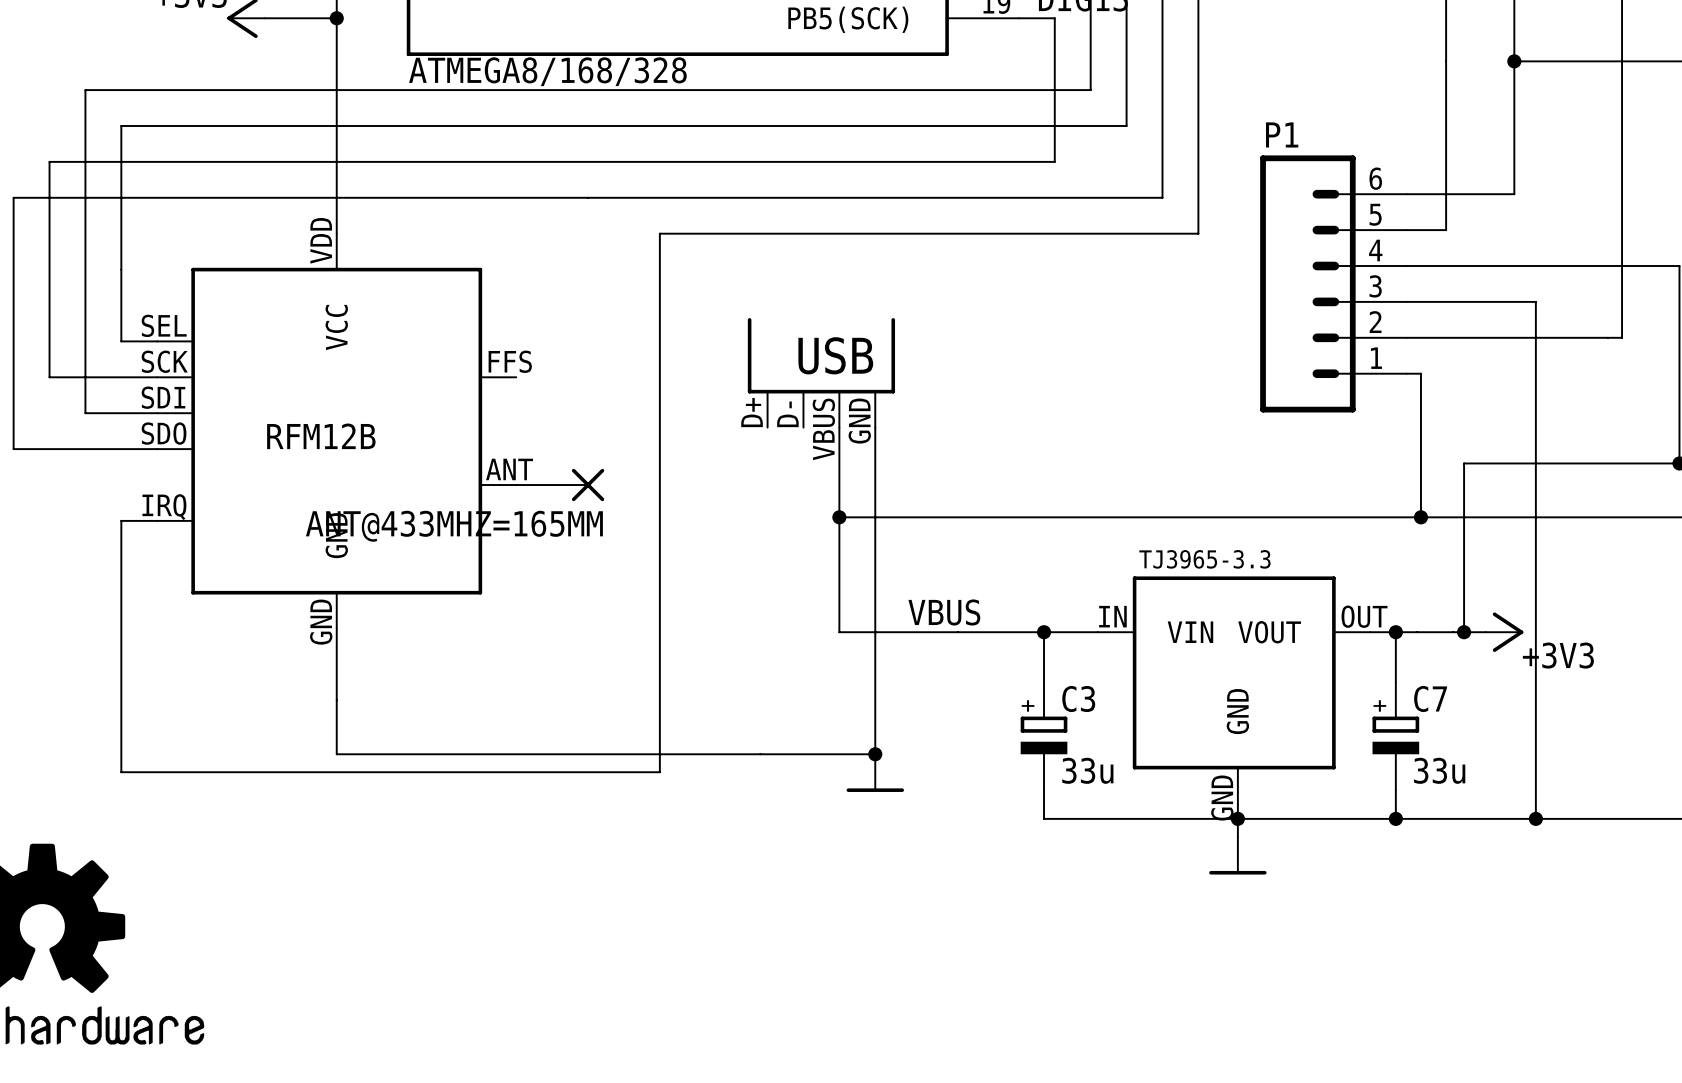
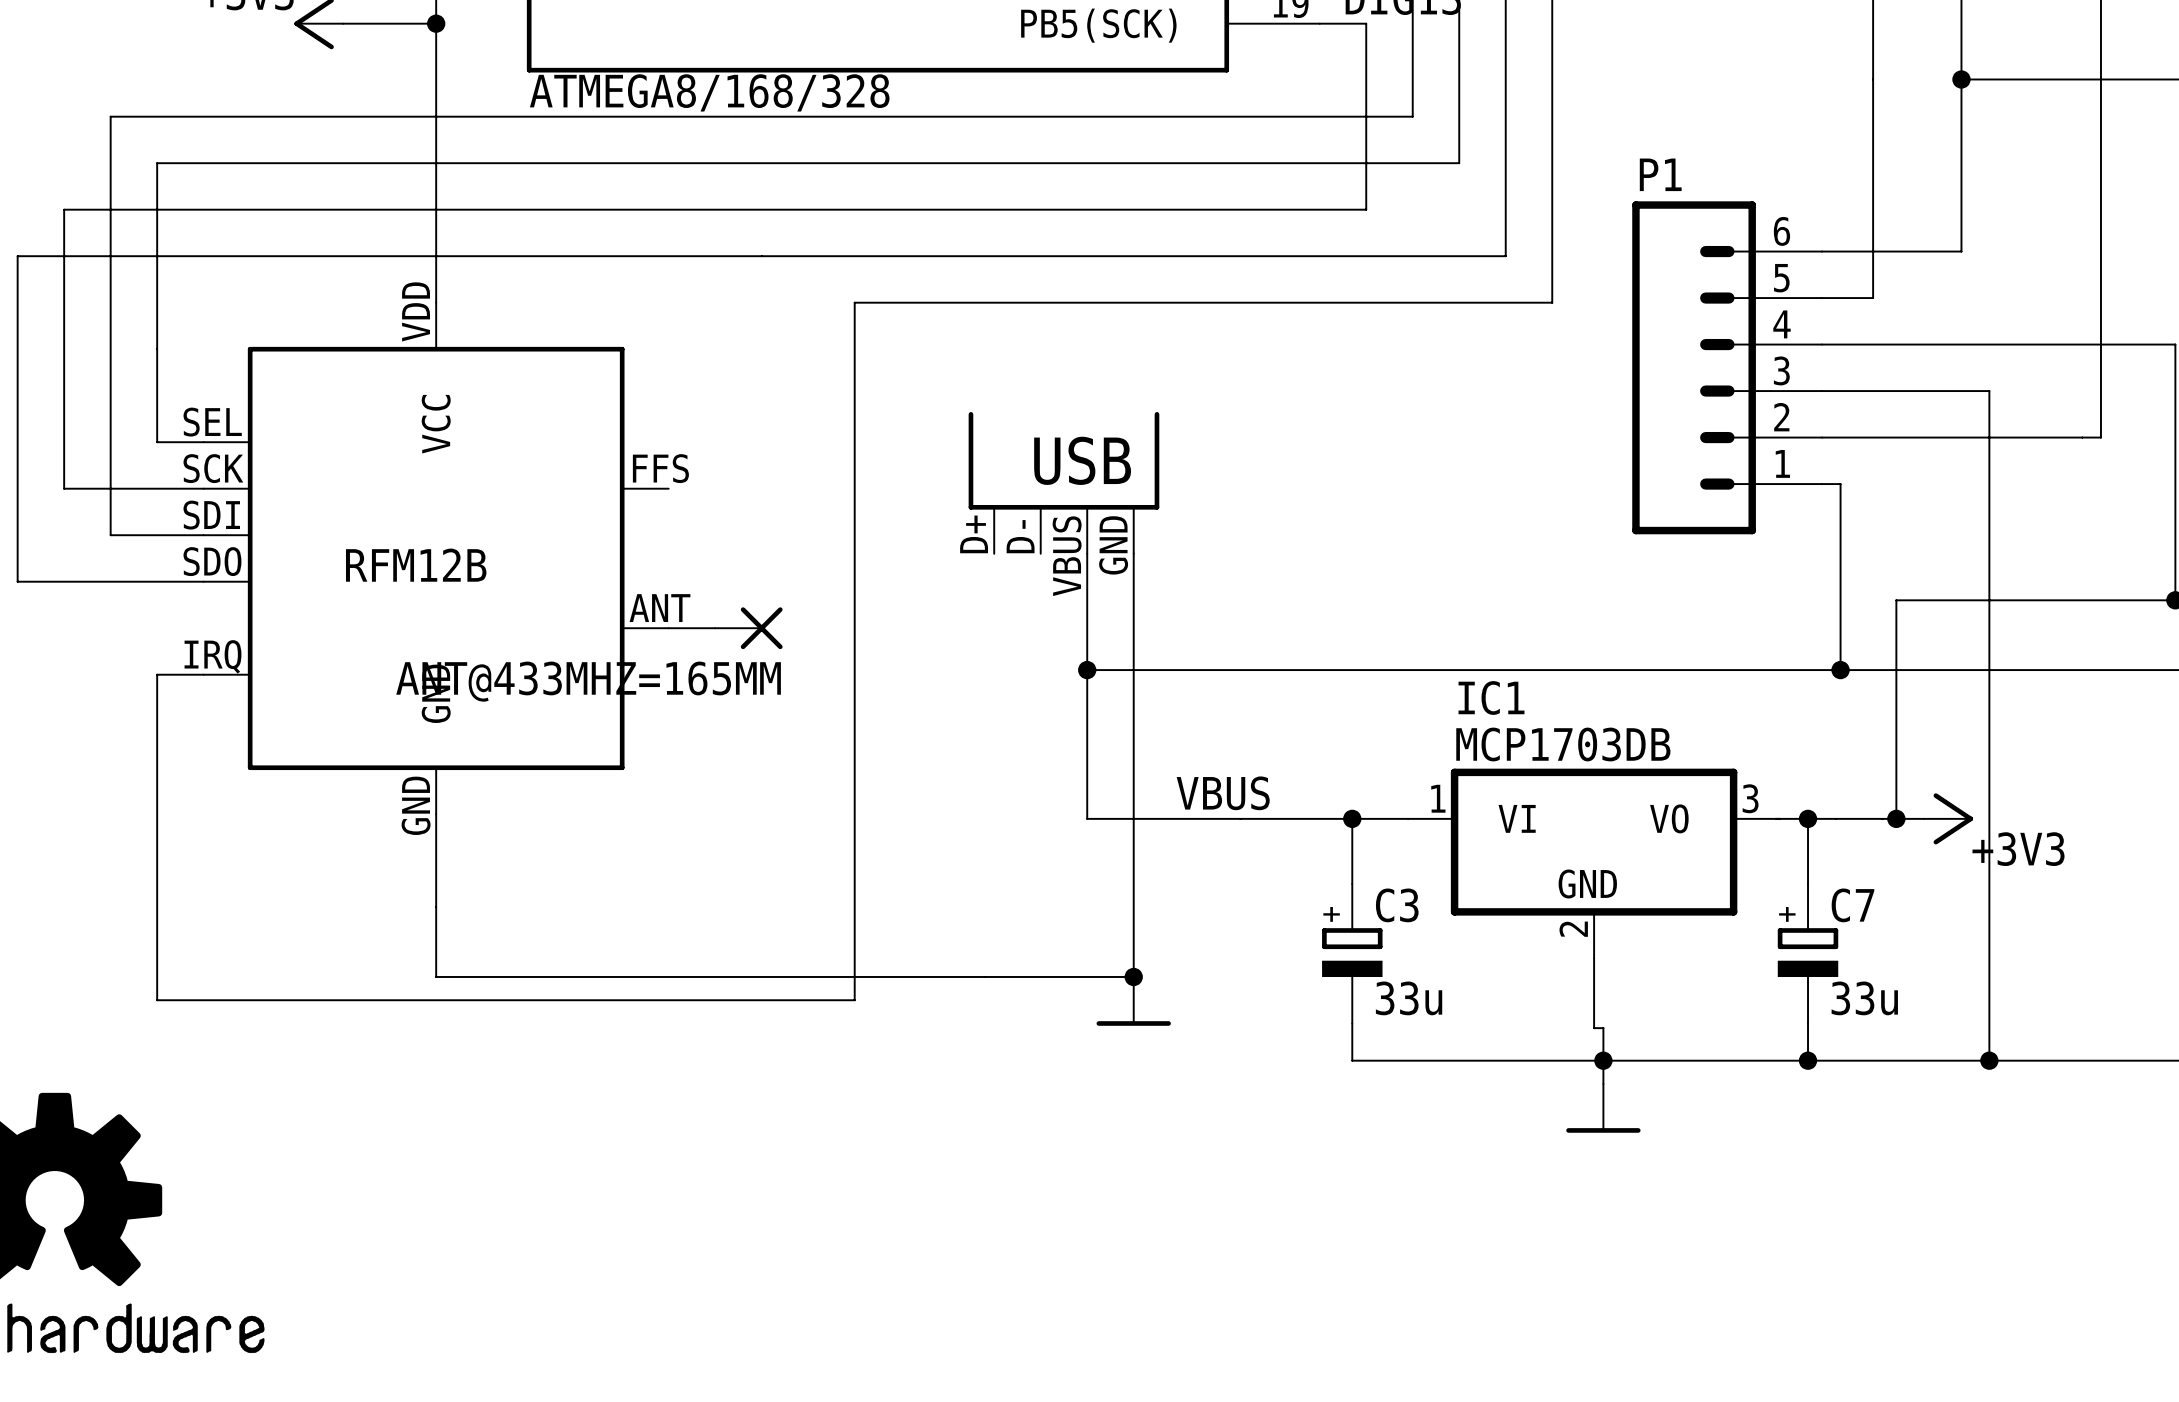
IC1: none -> MCP1703DB (1594, 863)
part: TJ3965-3.3 (1234, 690) -> none
wire: none -> (1594, 958) (1594, 1028) (1603, 1028) (1603, 1042)

